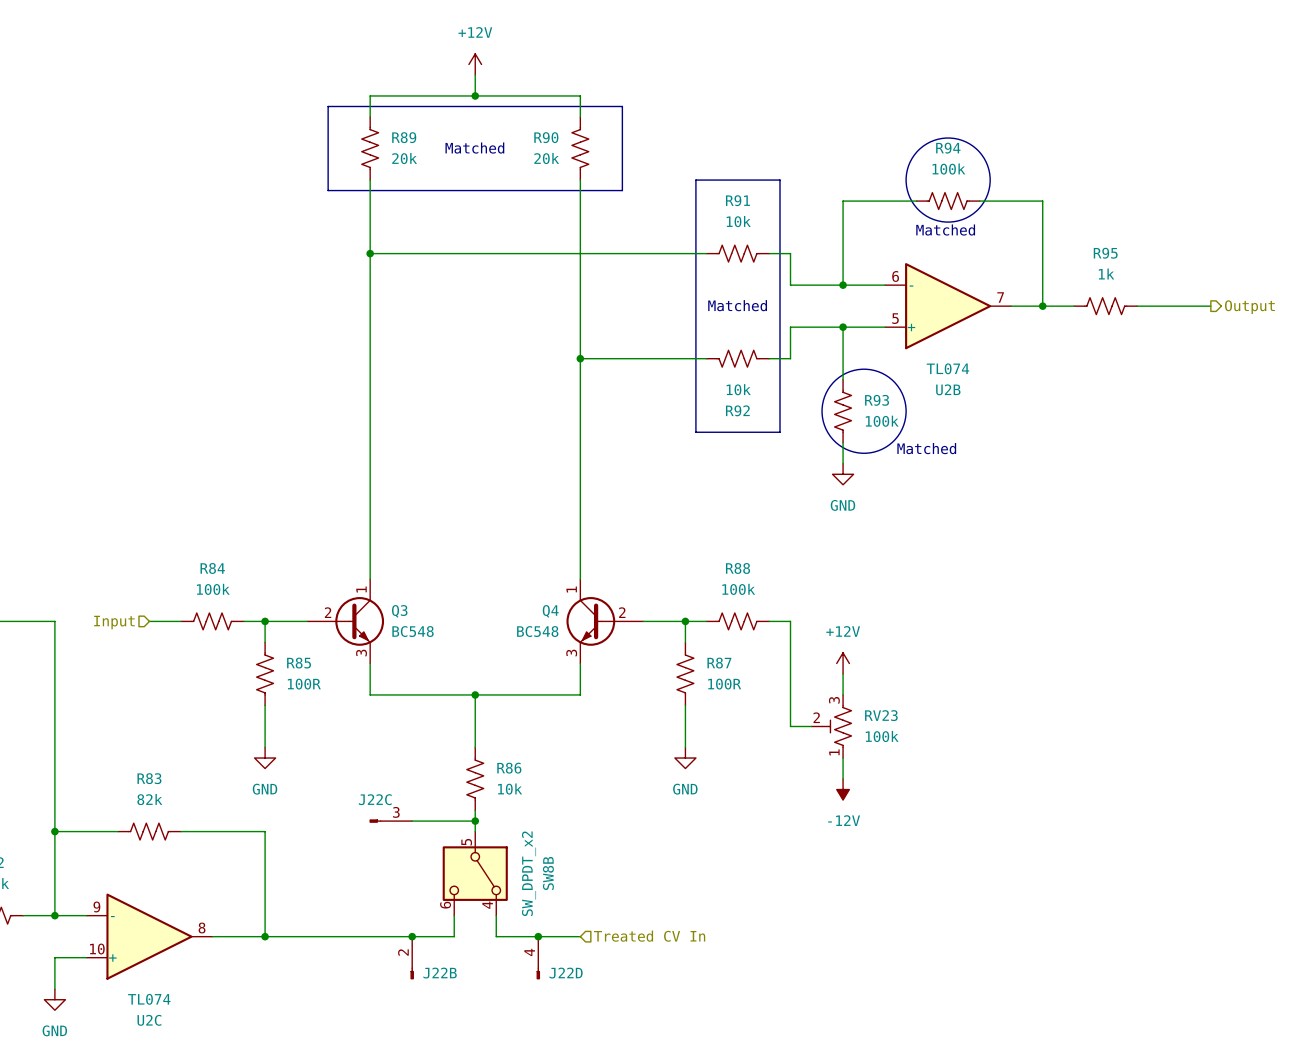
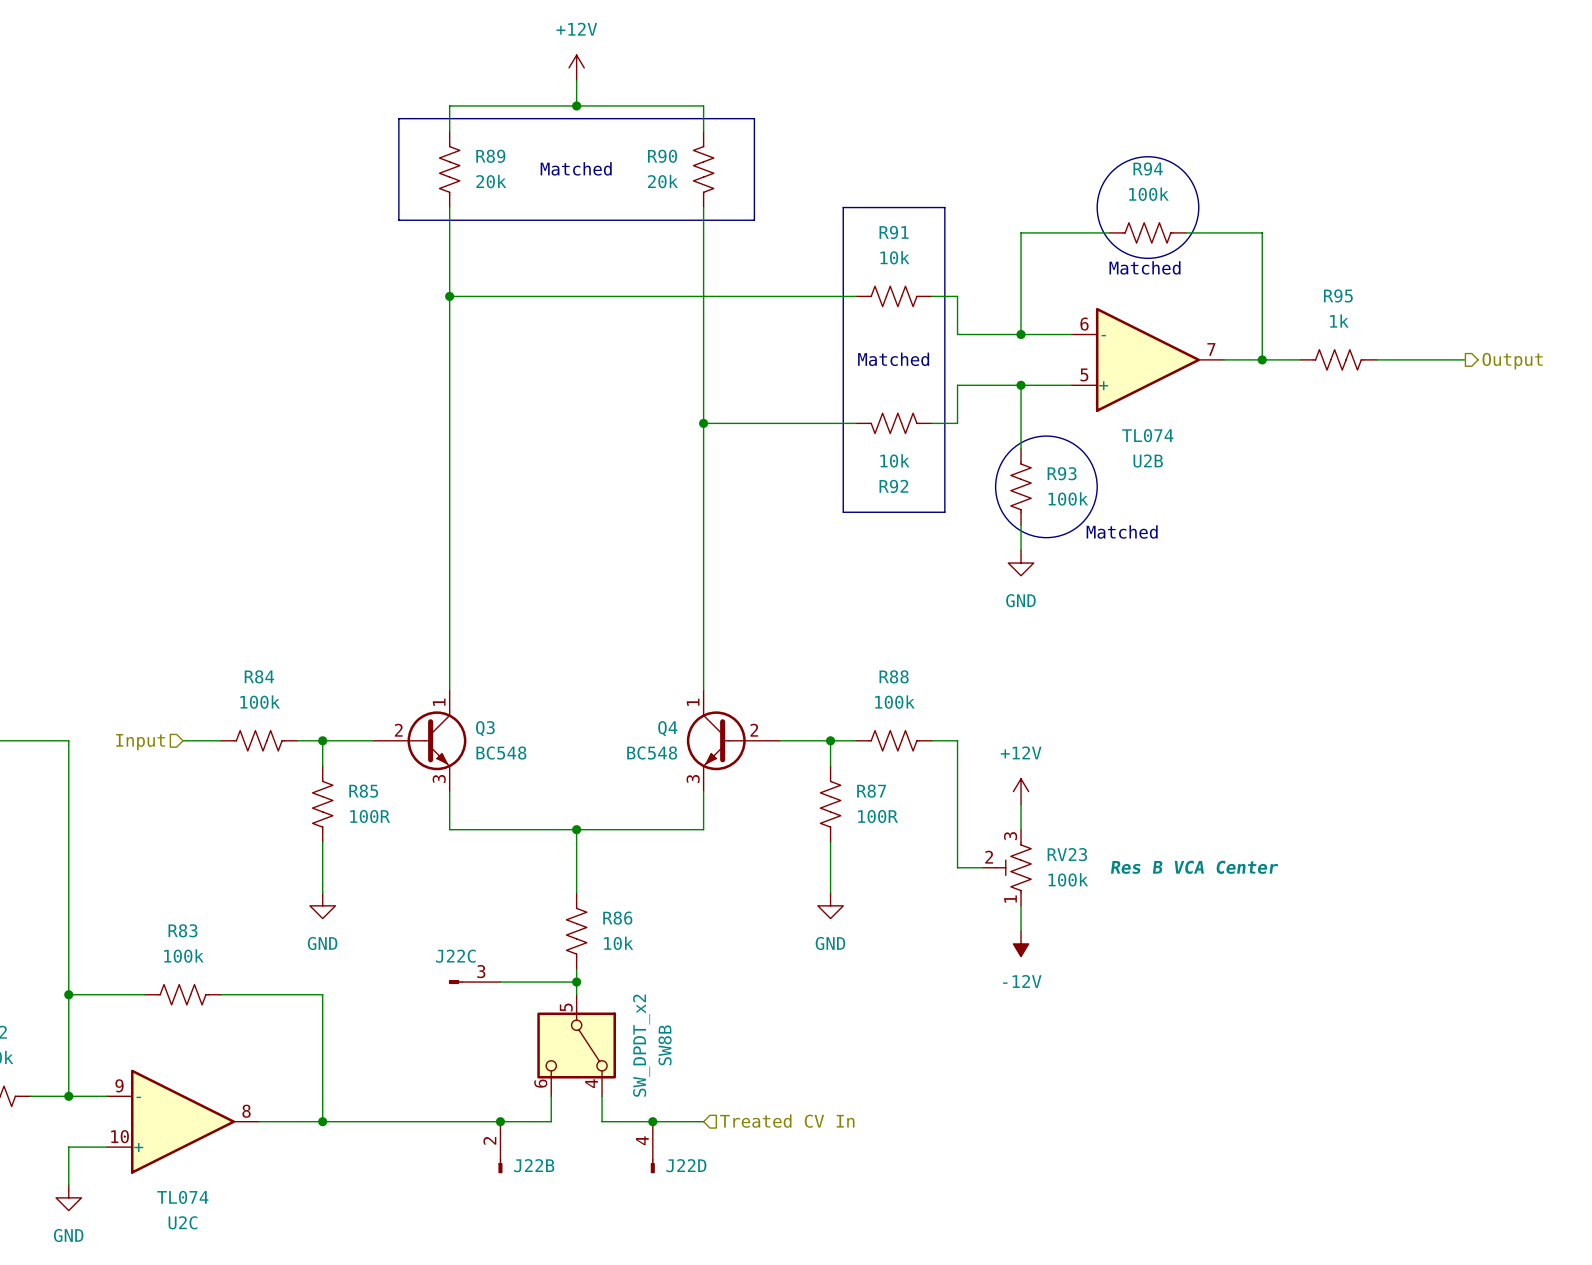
RV23 text: none -> Res B VCA Center (1194, 867)
R83 value: 82k (149, 799) -> 100k (183, 956)

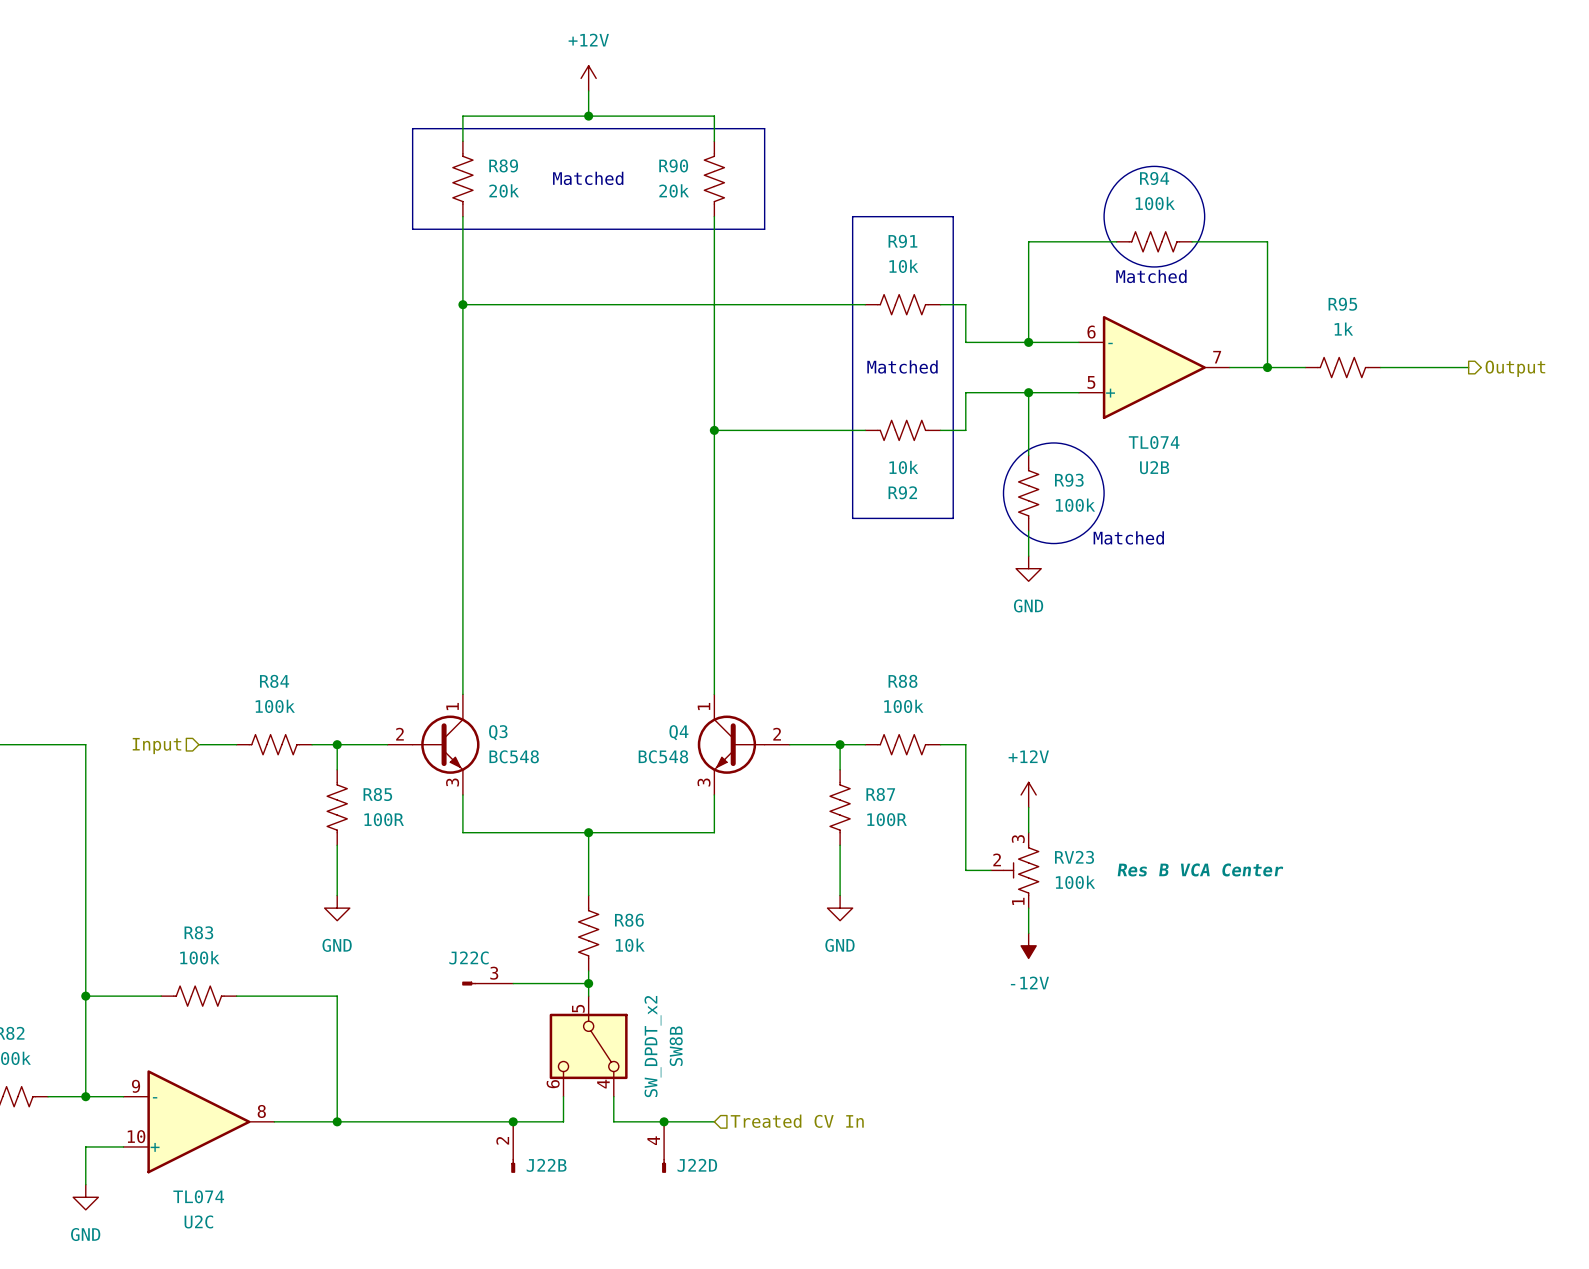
Q3 symbol: [373, 690, 467, 792] -> [387, 694, 480, 795]
Q4 symbol: [686, 690, 780, 792] -> [697, 694, 790, 795]

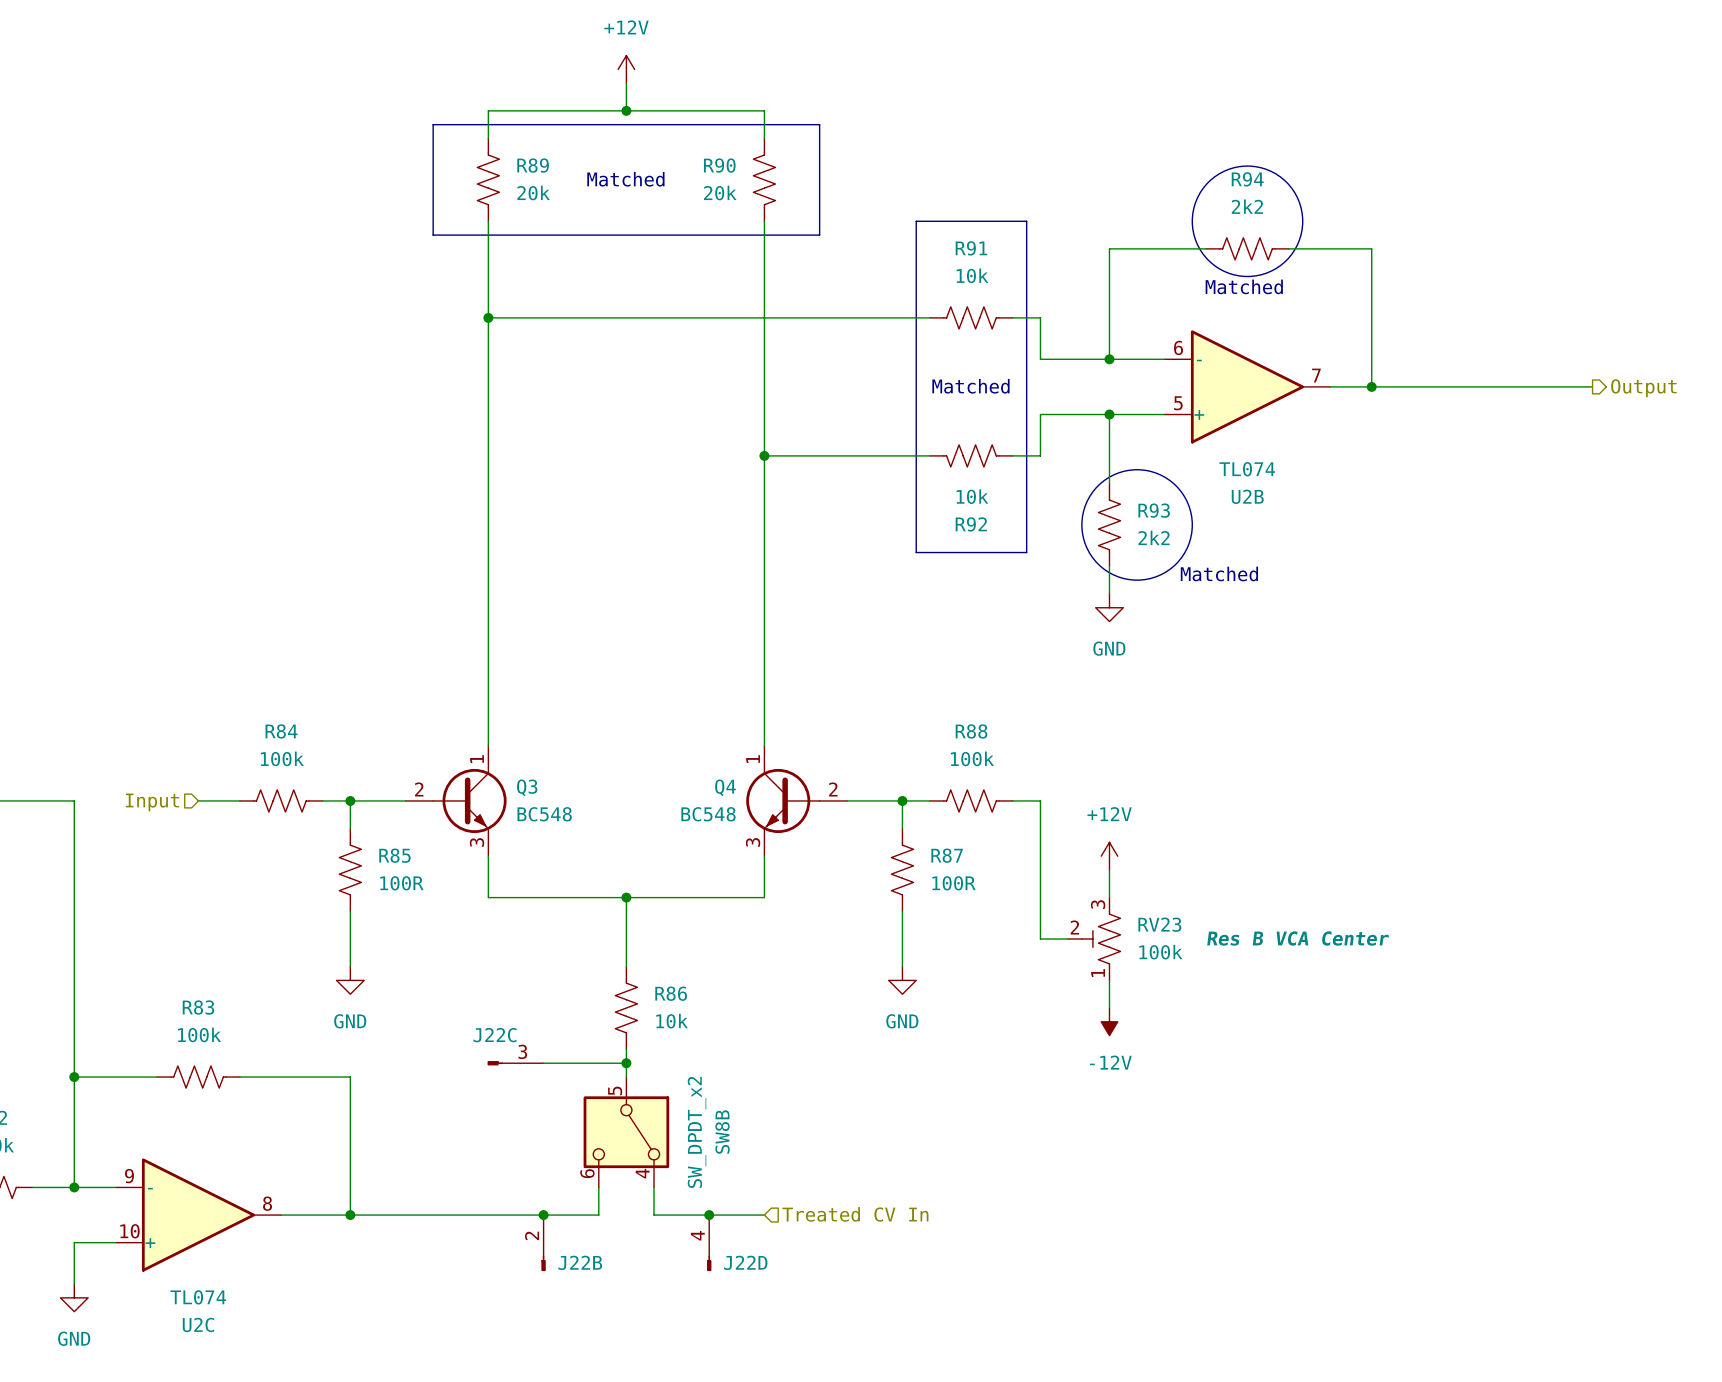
R94 value: 100k (1155, 203) -> 2k2 (1247, 206)
R95: 1k (1342, 367) -> none
R93 value: 100k (1075, 505) -> 2k2 (1154, 537)

